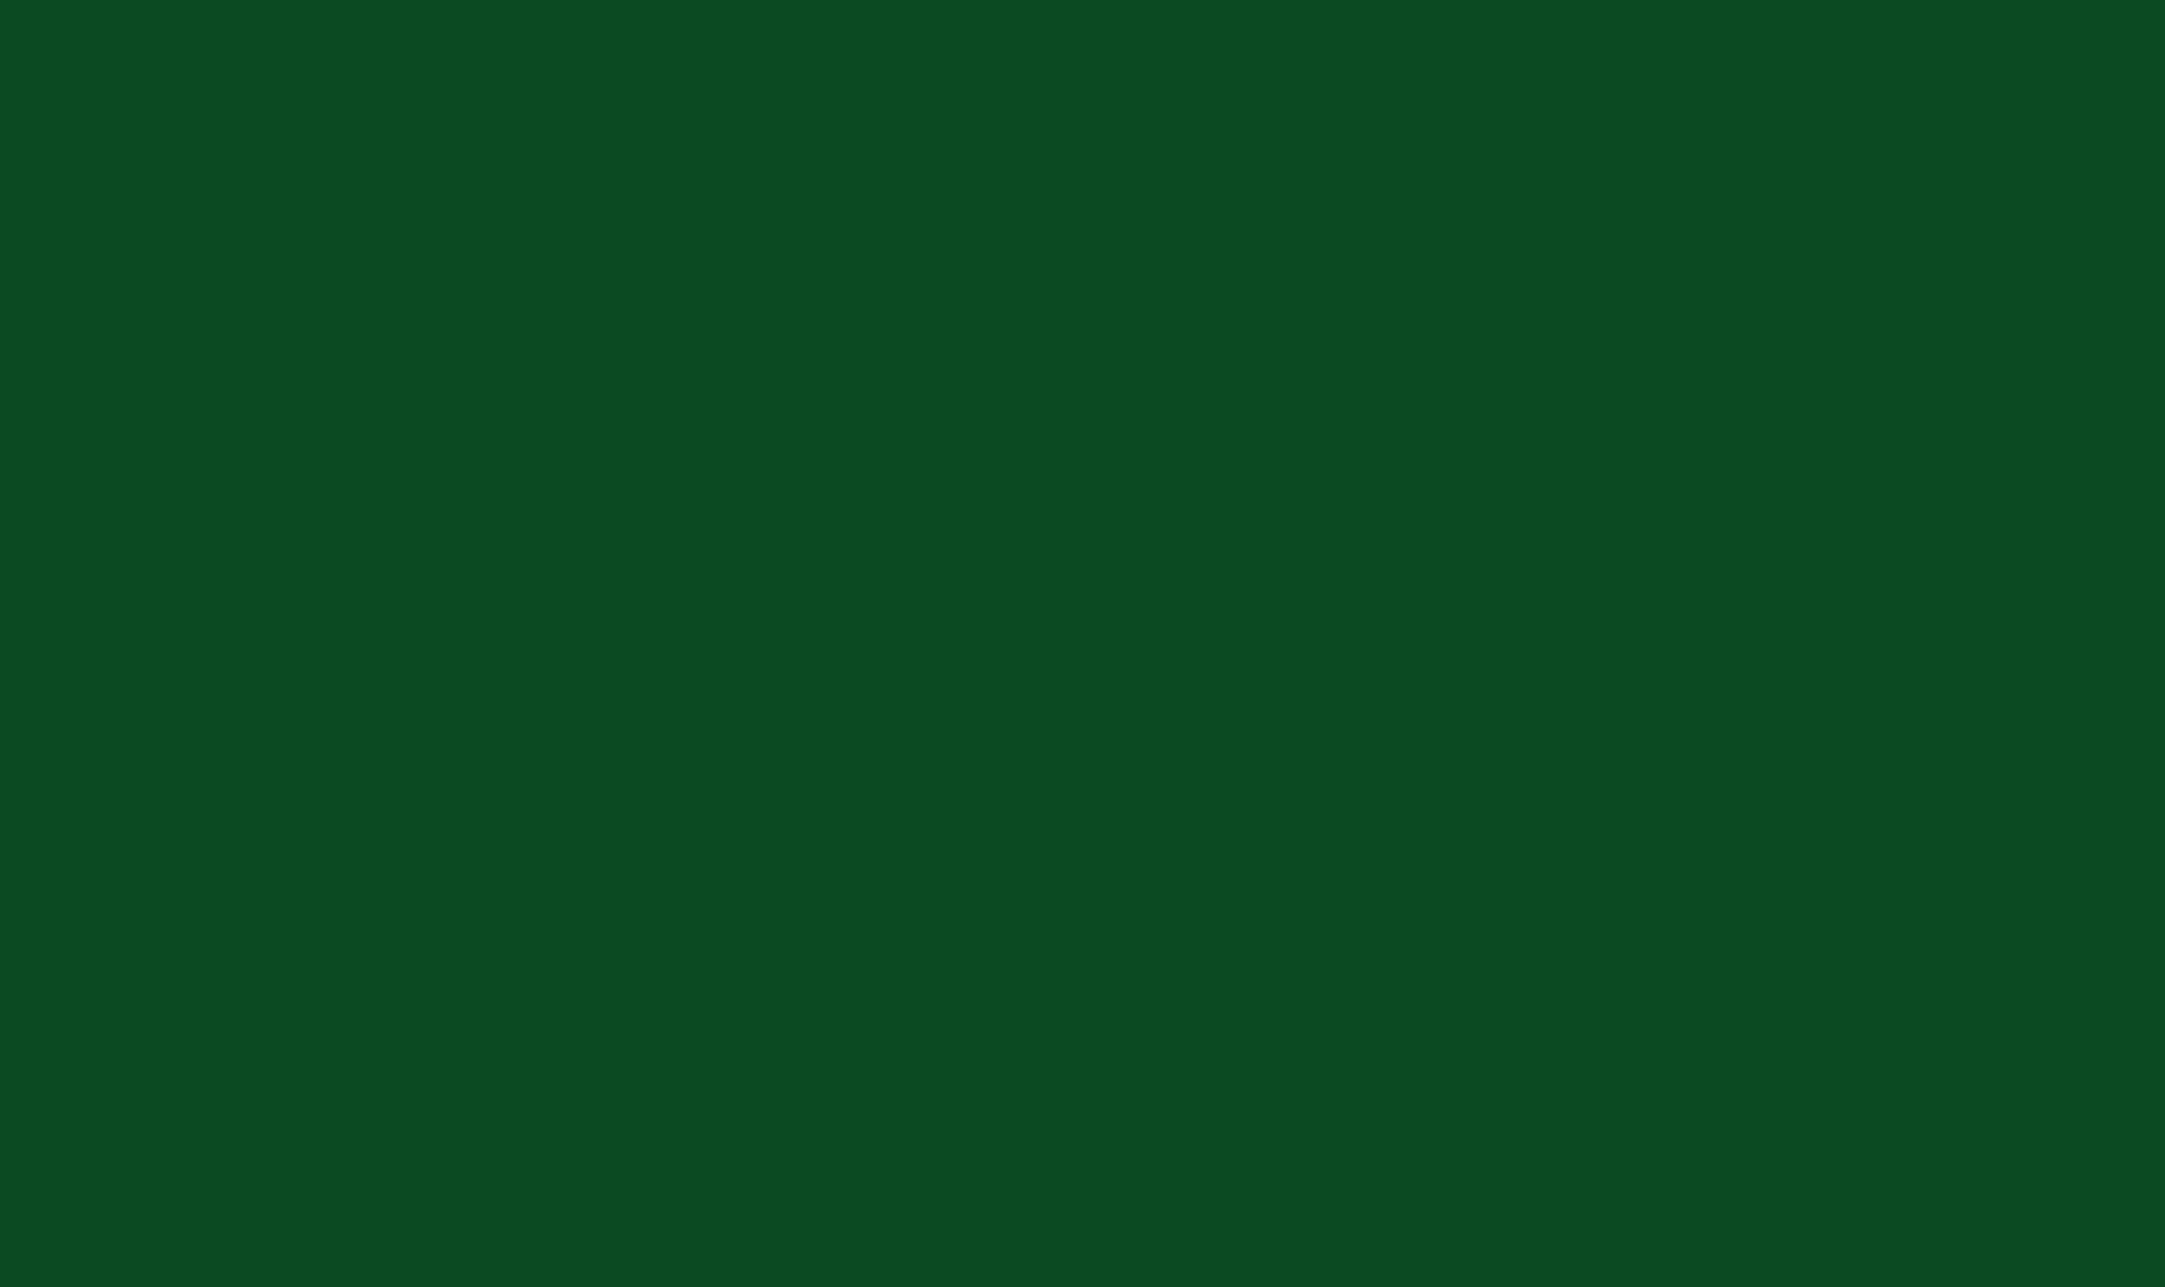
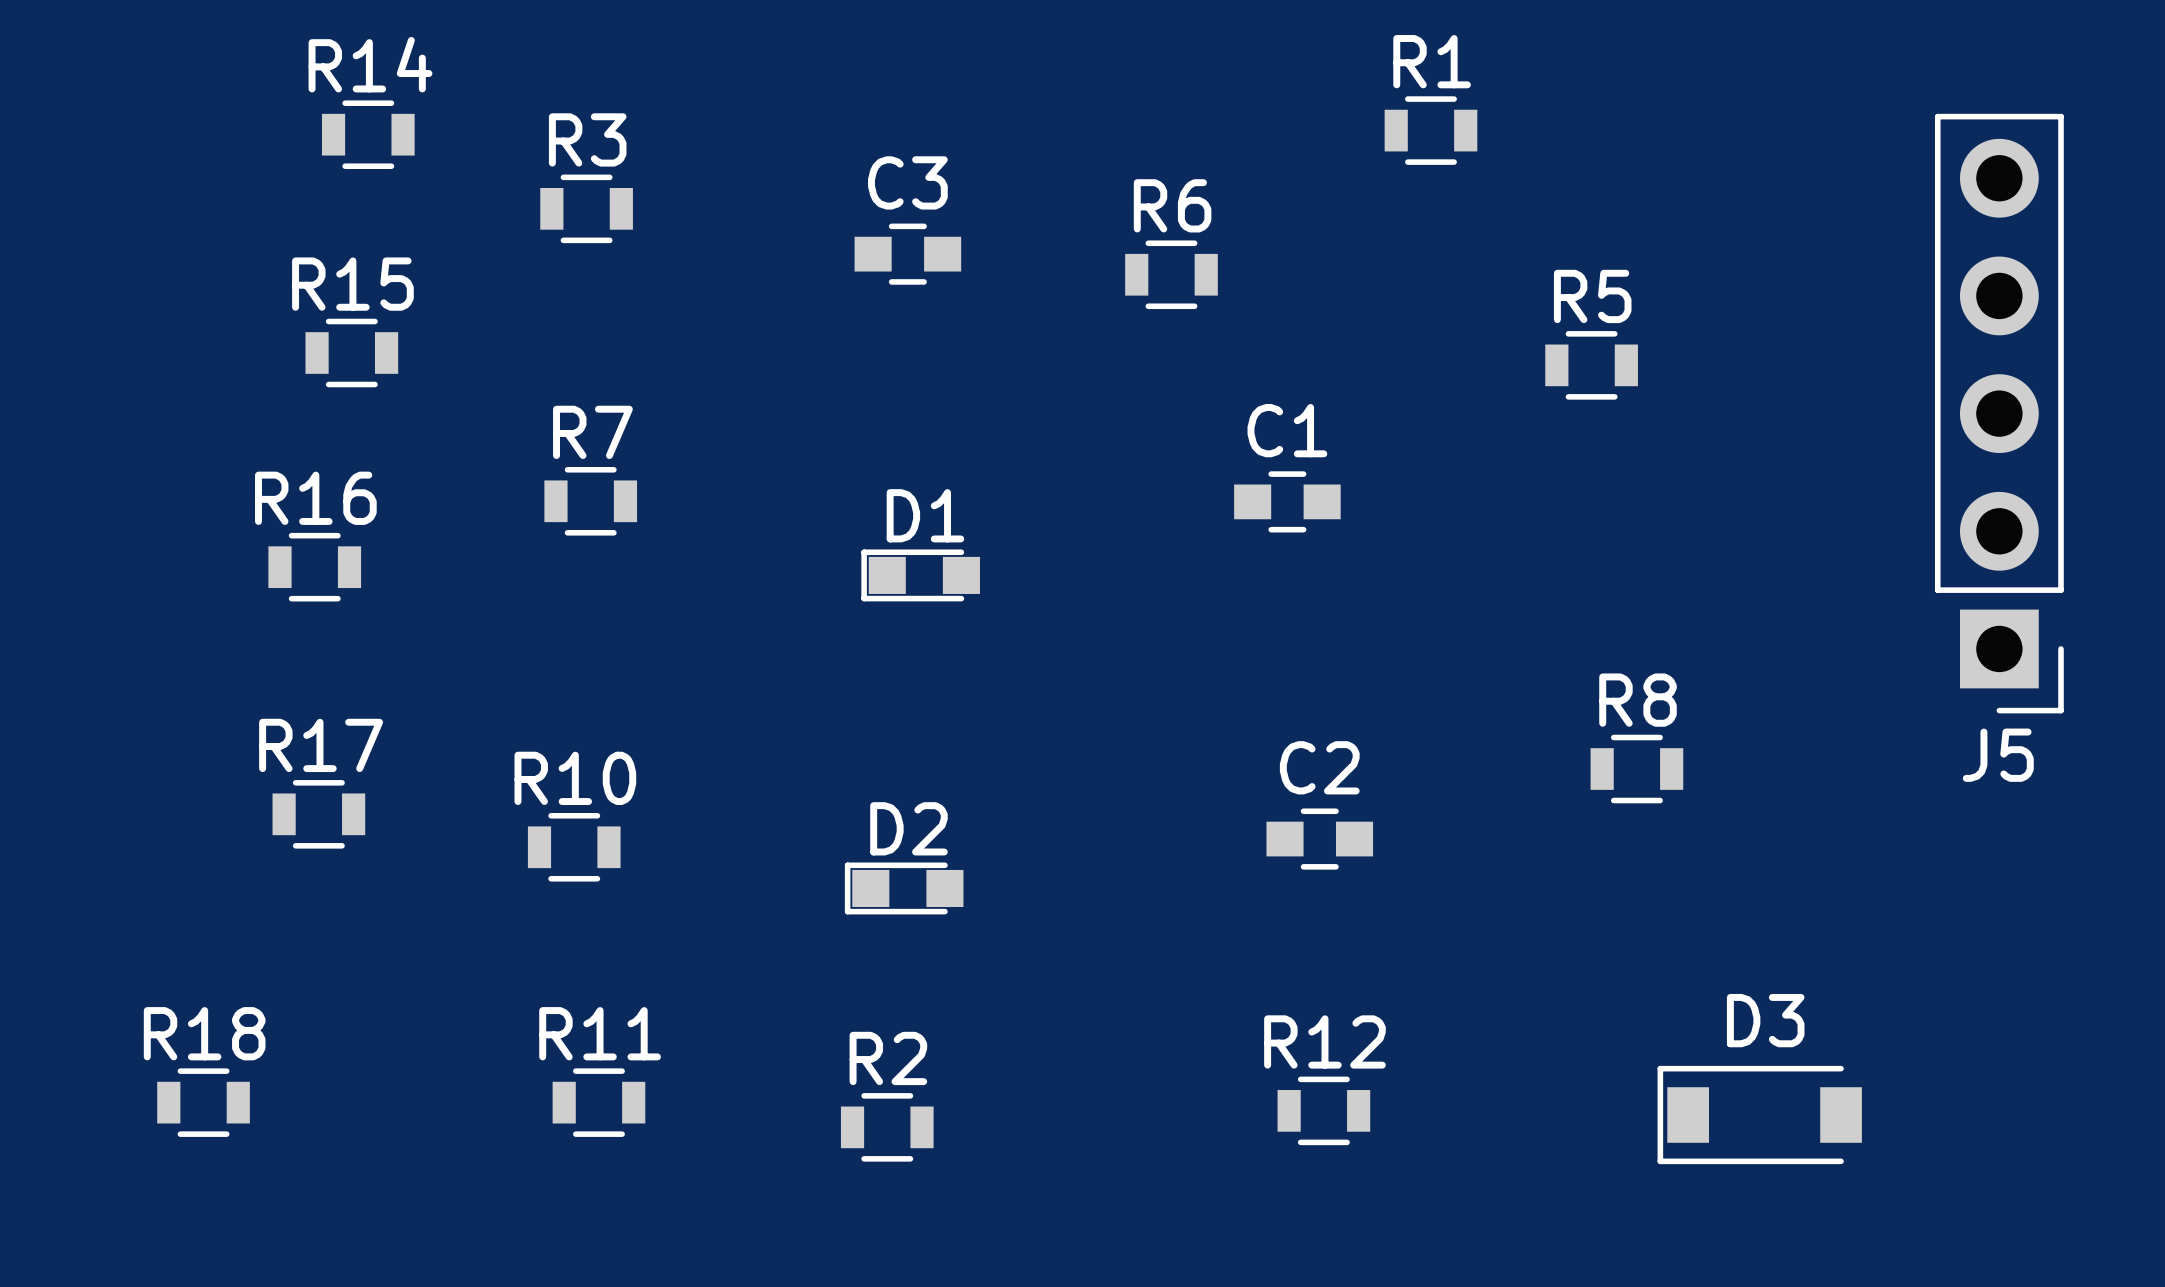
R1: none -> (1430, 130)
R14: none -> (368, 134)
R3: none -> (586, 208)
C3: none -> (907, 254)
R6: none -> (1171, 274)
R15: none -> (351, 353)
R5: none -> (1591, 365)
J5: none -> (1999, 413)
R7: none -> (590, 501)
C1: none -> (1287, 501)
R16: none -> (314, 567)
D1: none -> (920, 575)
R8: none -> (1636, 769)
R17: none -> (318, 814)
C2: none -> (1319, 839)
R10: none -> (574, 847)
D2: none -> (904, 888)
R18: none -> (203, 1102)
R11: none -> (598, 1102)
R12: none -> (1323, 1110)
D3: none -> (1759, 1115)
R2: none -> (887, 1127)

